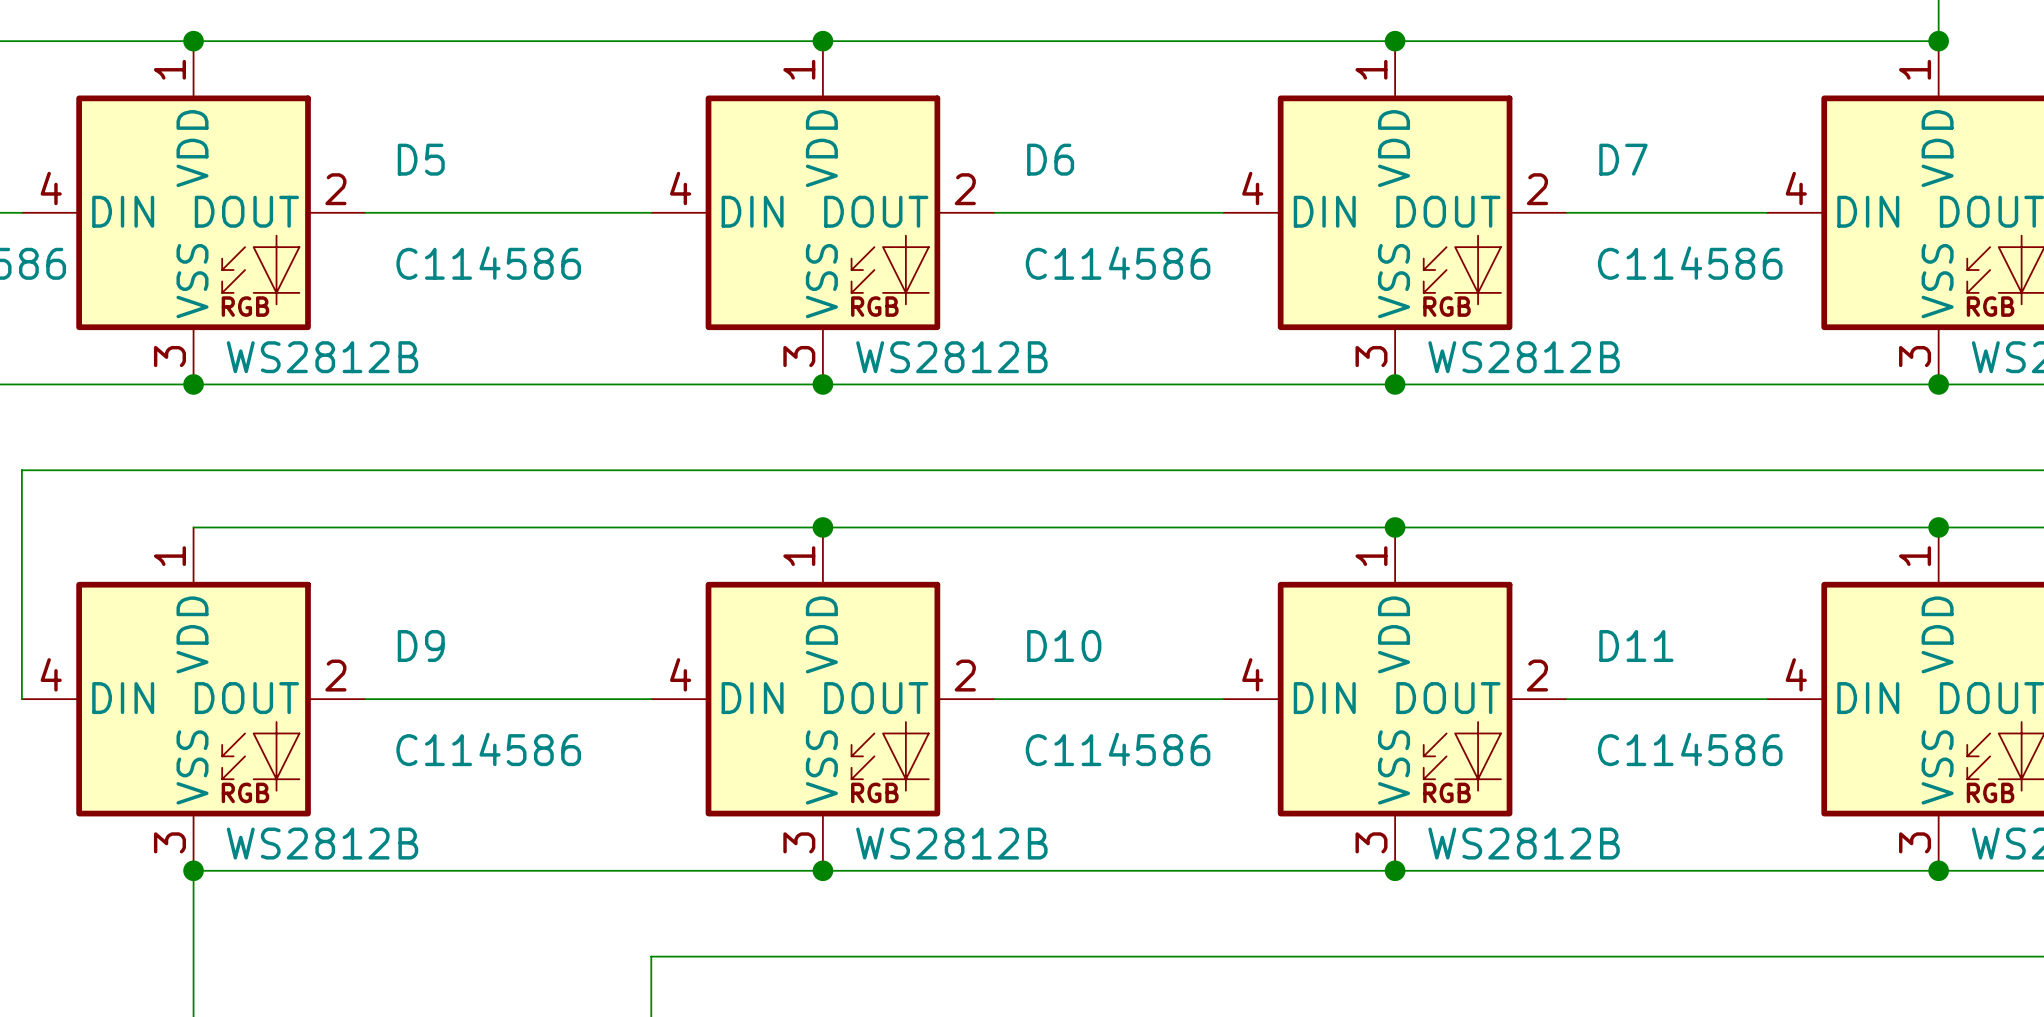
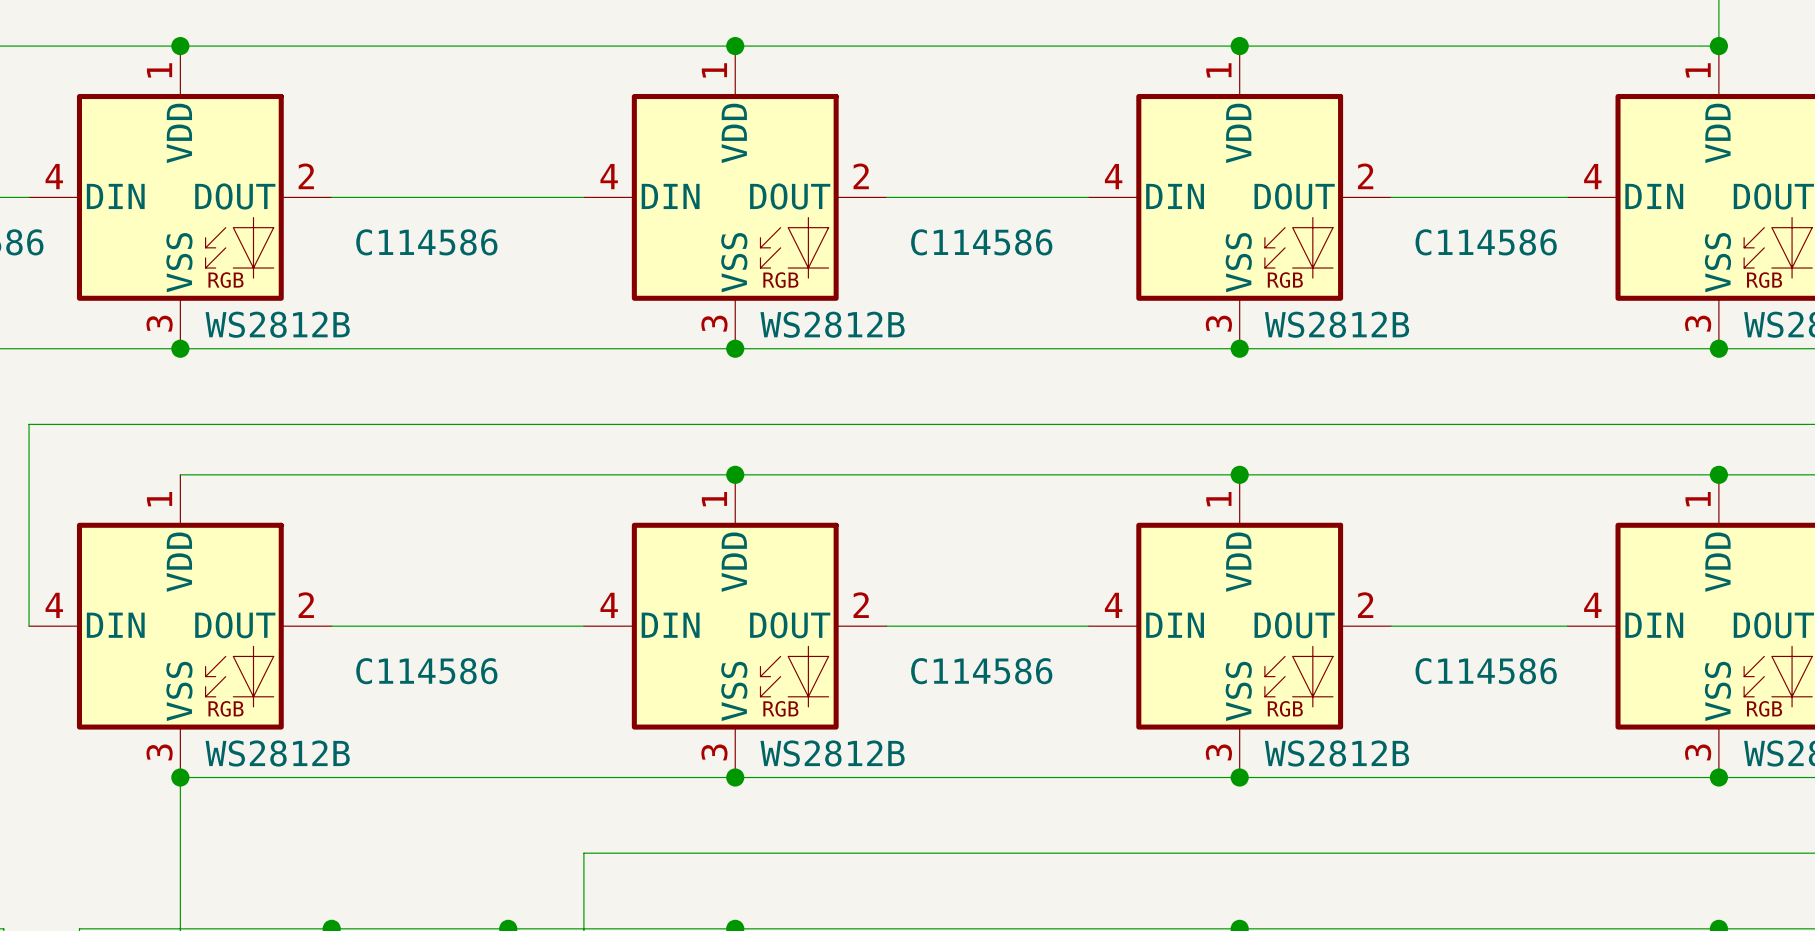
D5 name: D5 (421, 159) -> none
D6 name: D6 (1050, 159) -> none
D7 name: D7 (1623, 159) -> none
D9 name: D9 (421, 646) -> none
D10 name: D10 (1064, 646) -> none
D11 name: D11 (1636, 646) -> none

